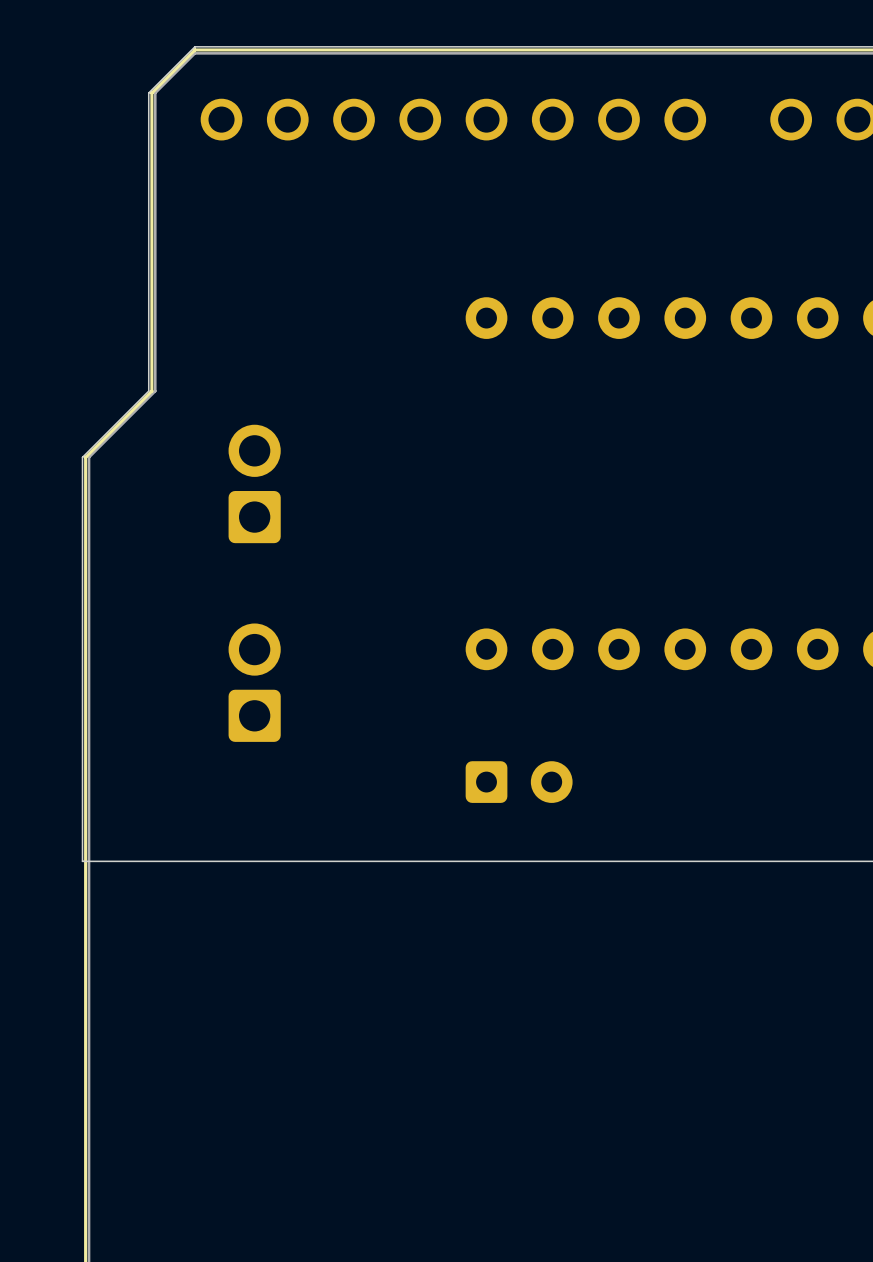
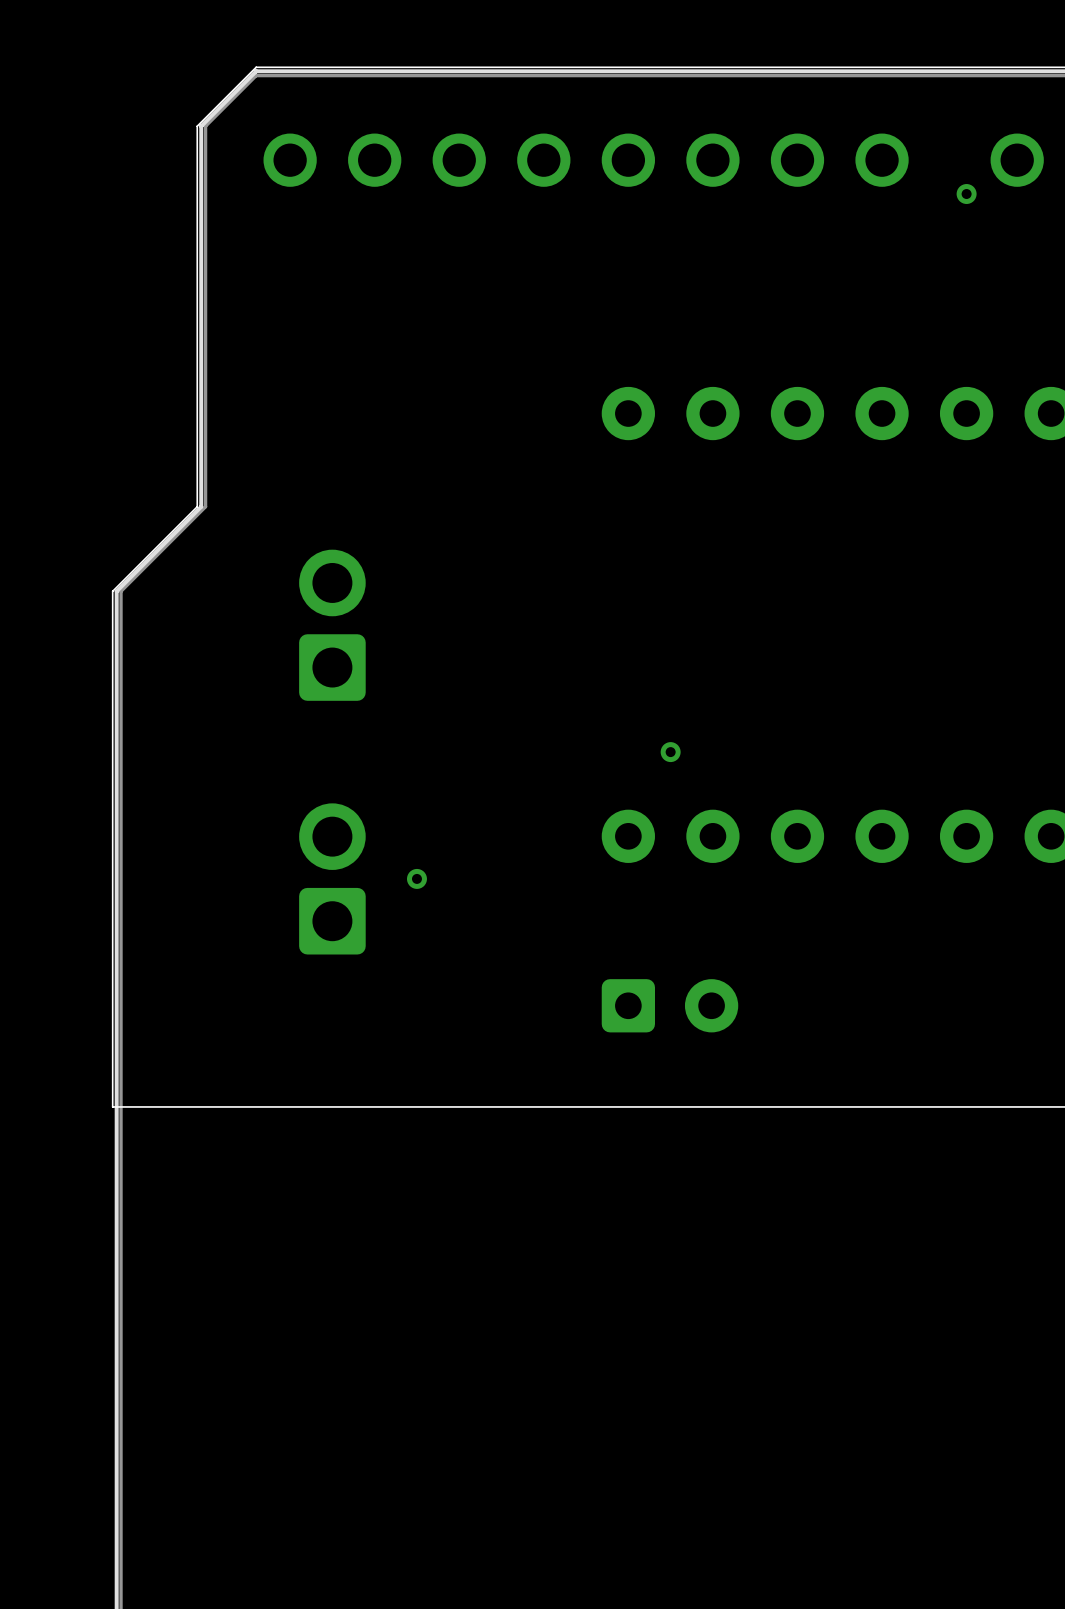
via: none -> (966, 194)
via: none -> (670, 752)
via: none -> (416, 878)

